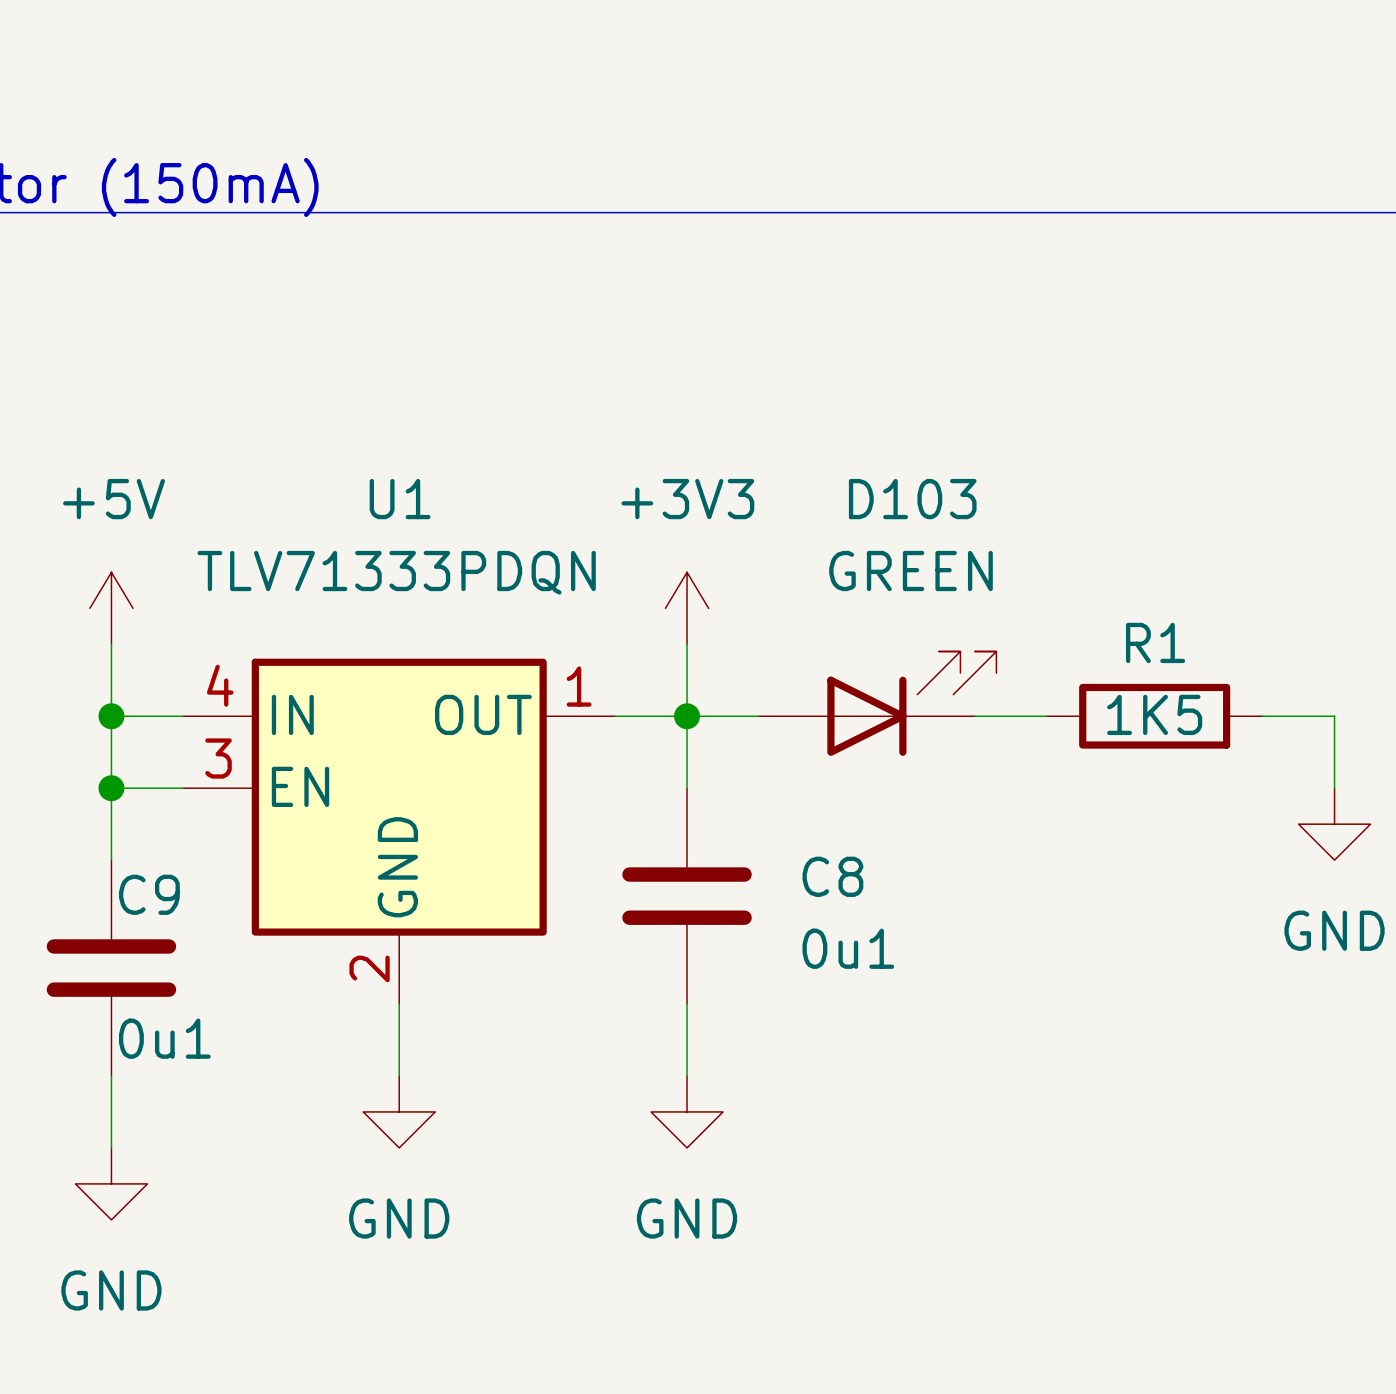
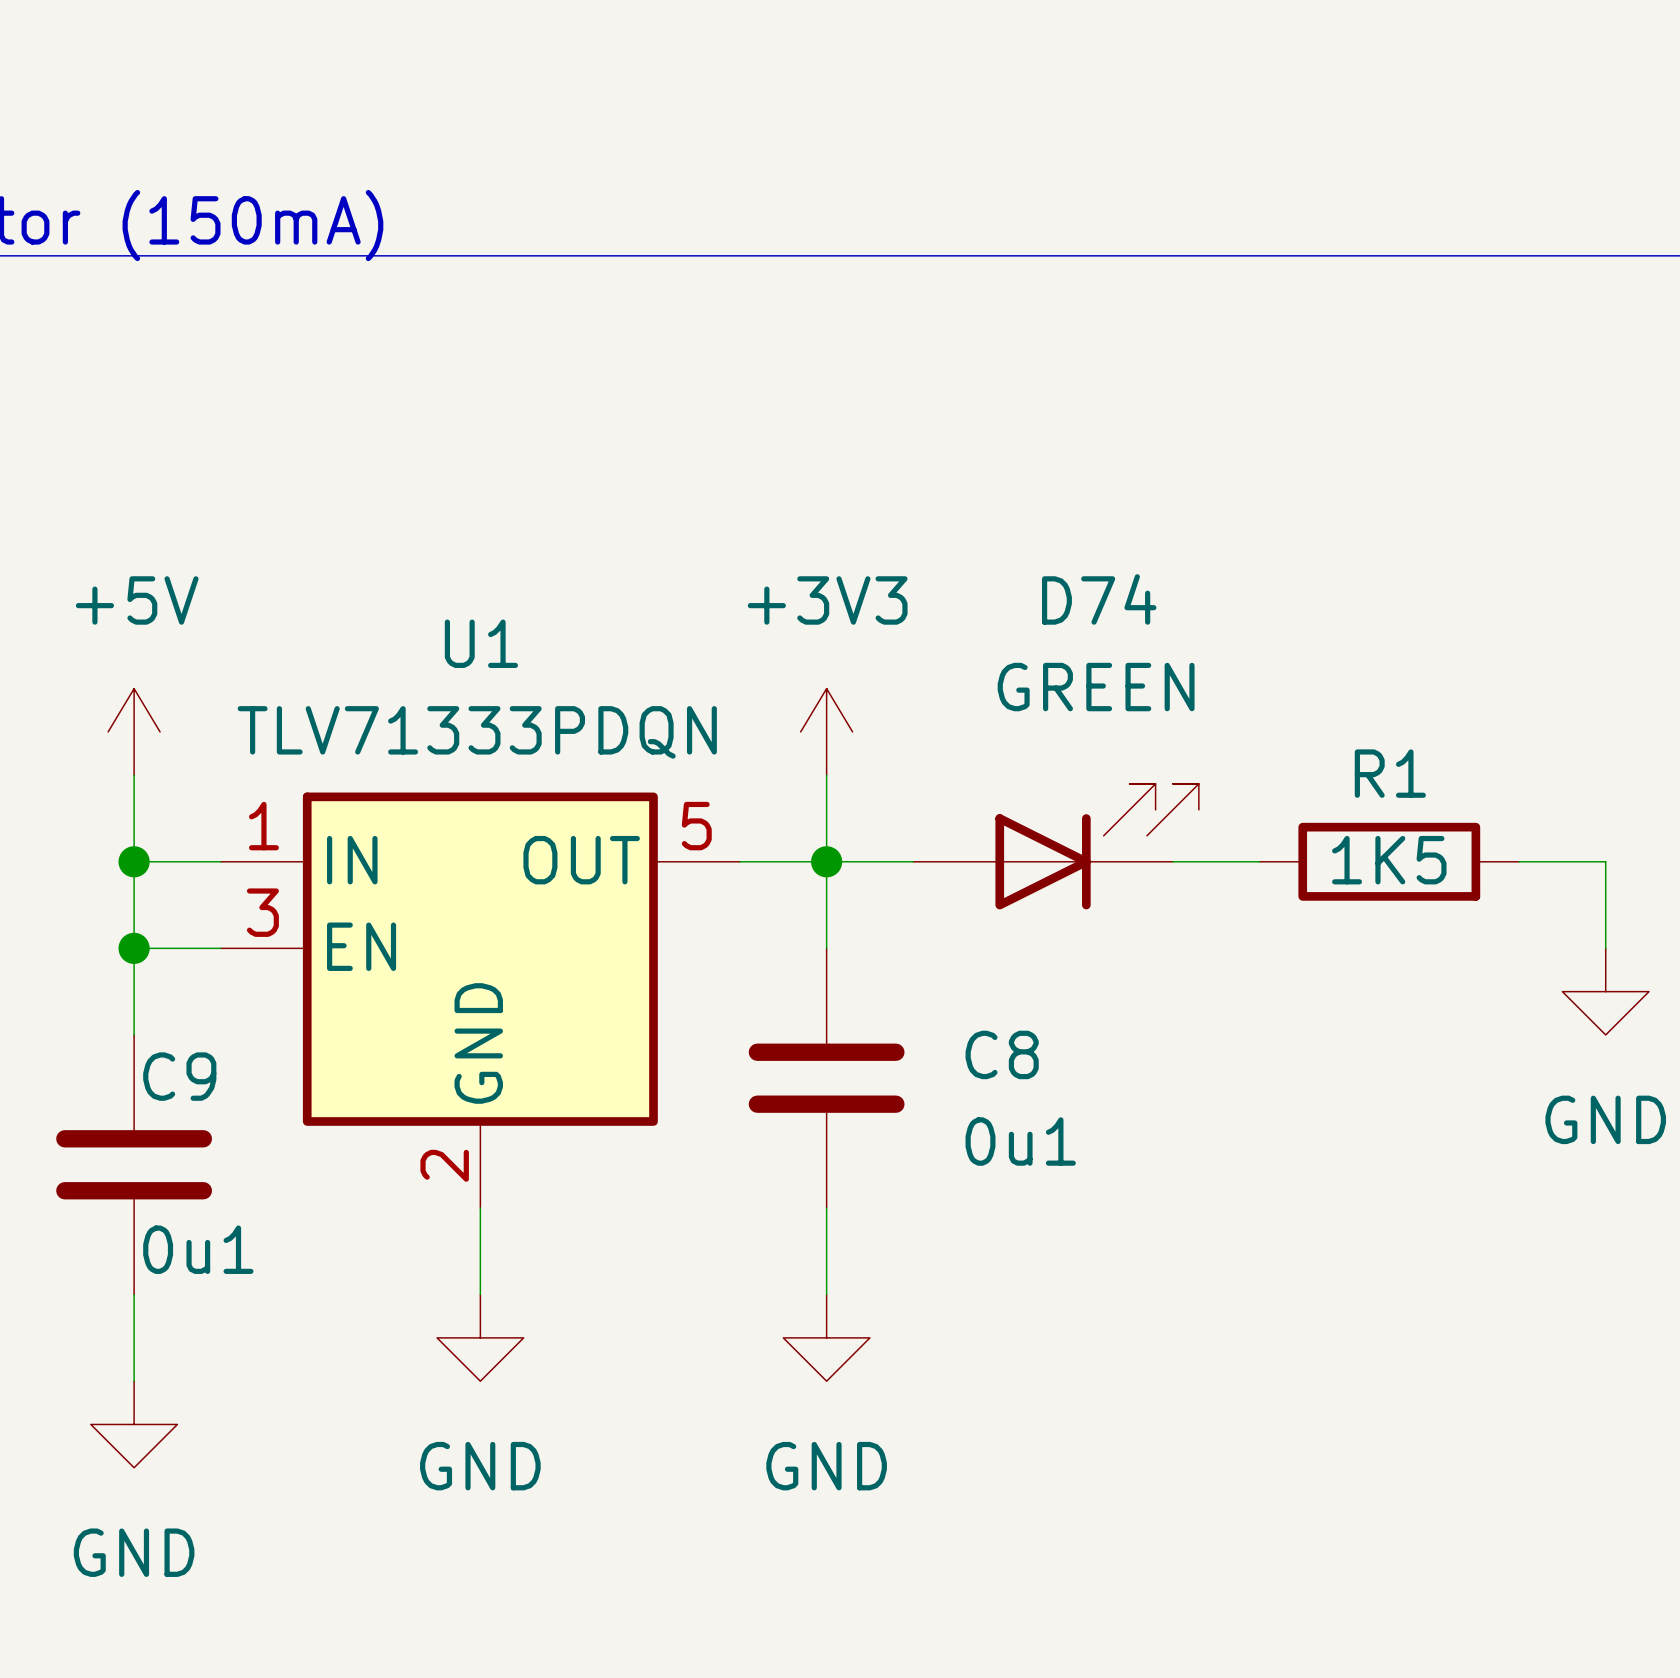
U1 name position: U1 (400, 499) -> U1 (481, 643)
D103 name: D103 (912, 499) -> D74 (1099, 599)
U1 value position: TLV71333PDQN (396, 572) -> TLV71333PDQN (477, 732)
U1 pin number: 4 (220, 685) -> 1 (263, 826)
U1 pin number: 1 (579, 686) -> 5 (696, 826)

